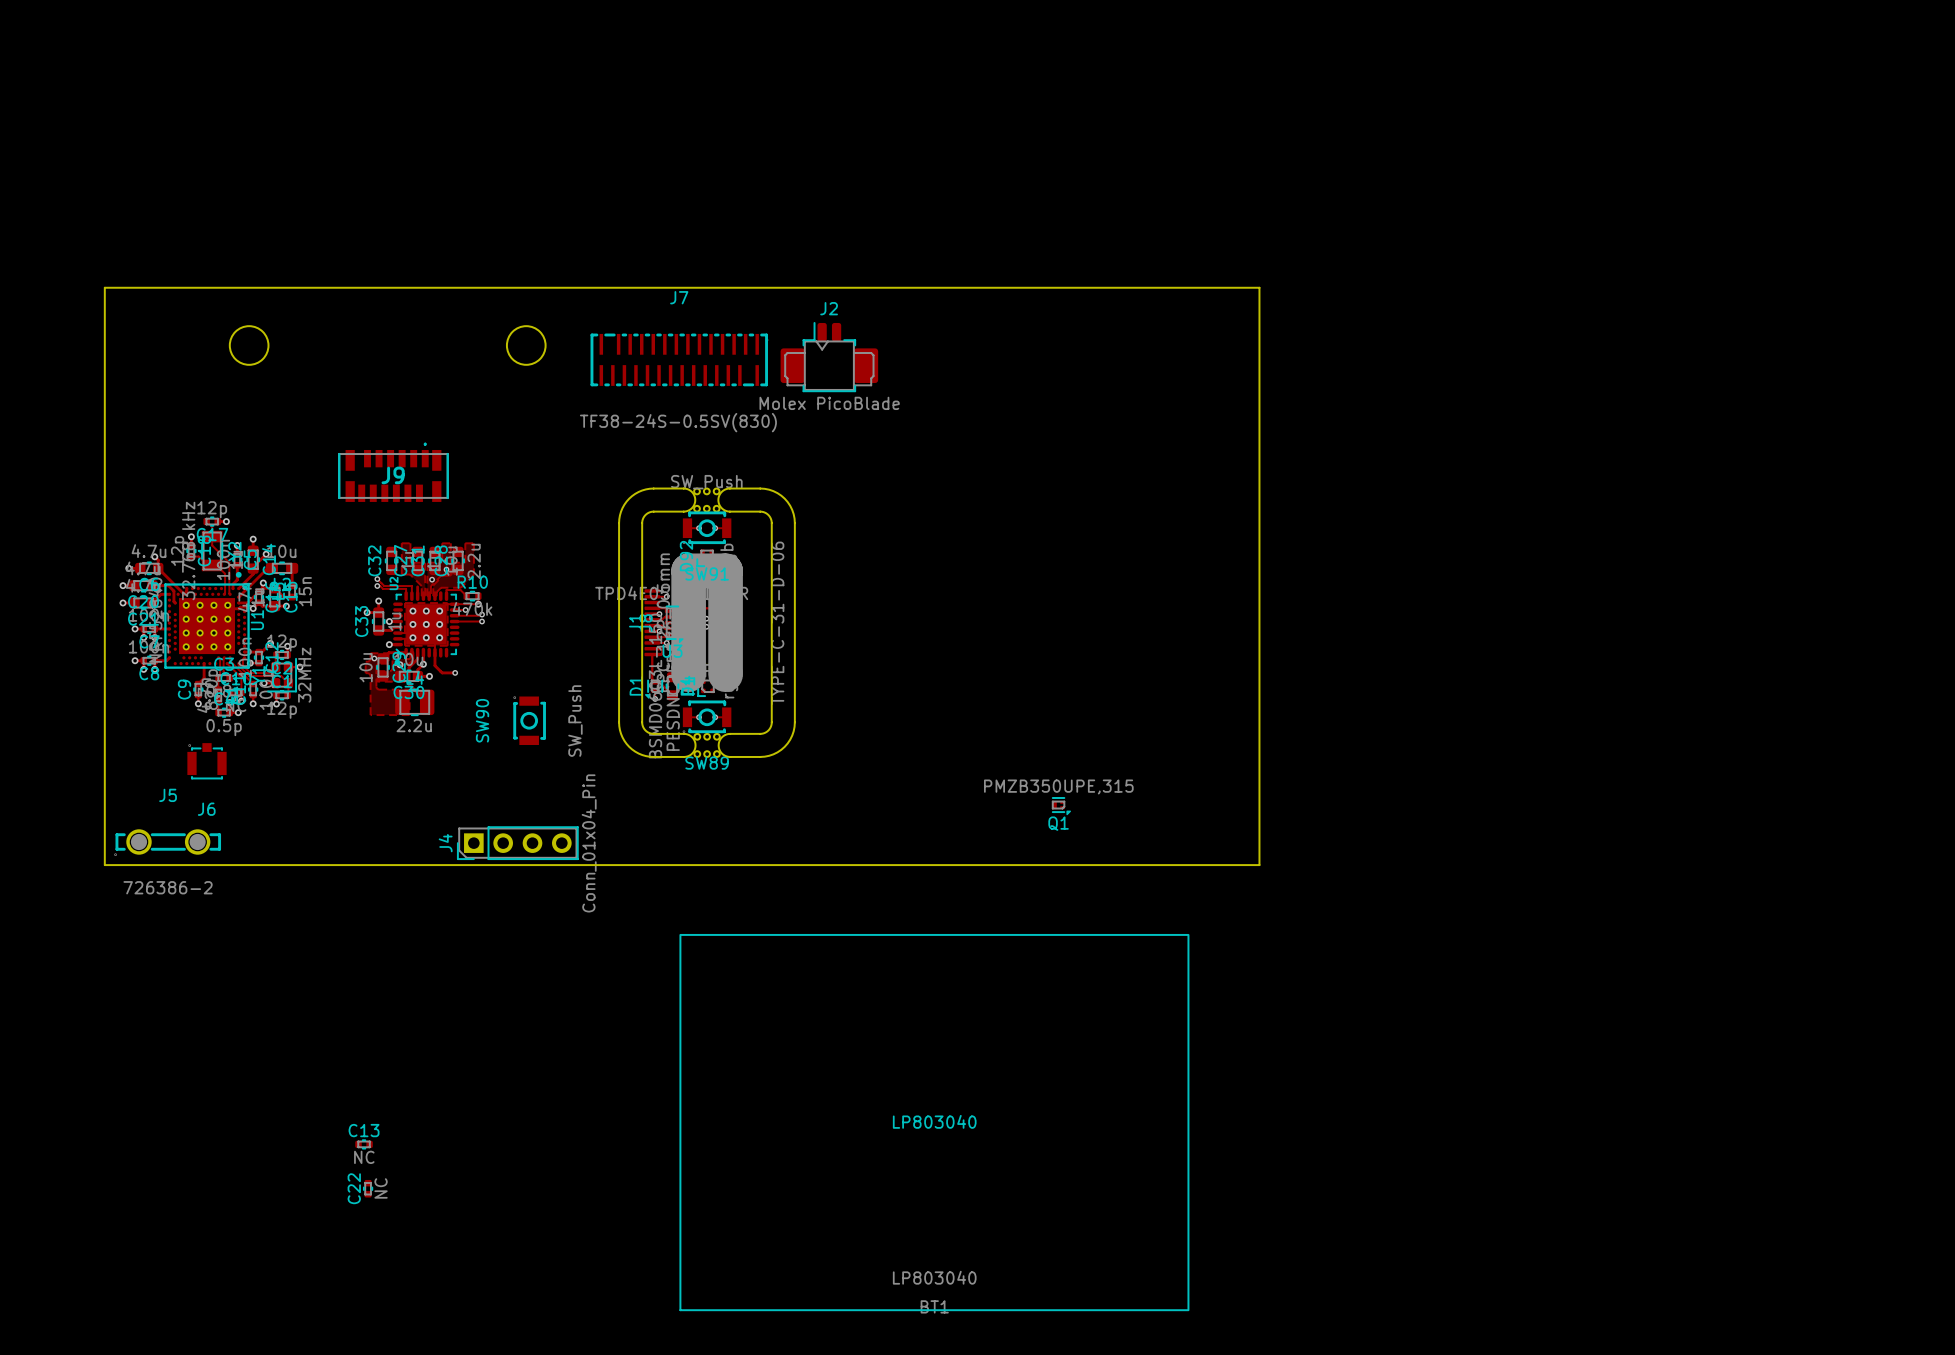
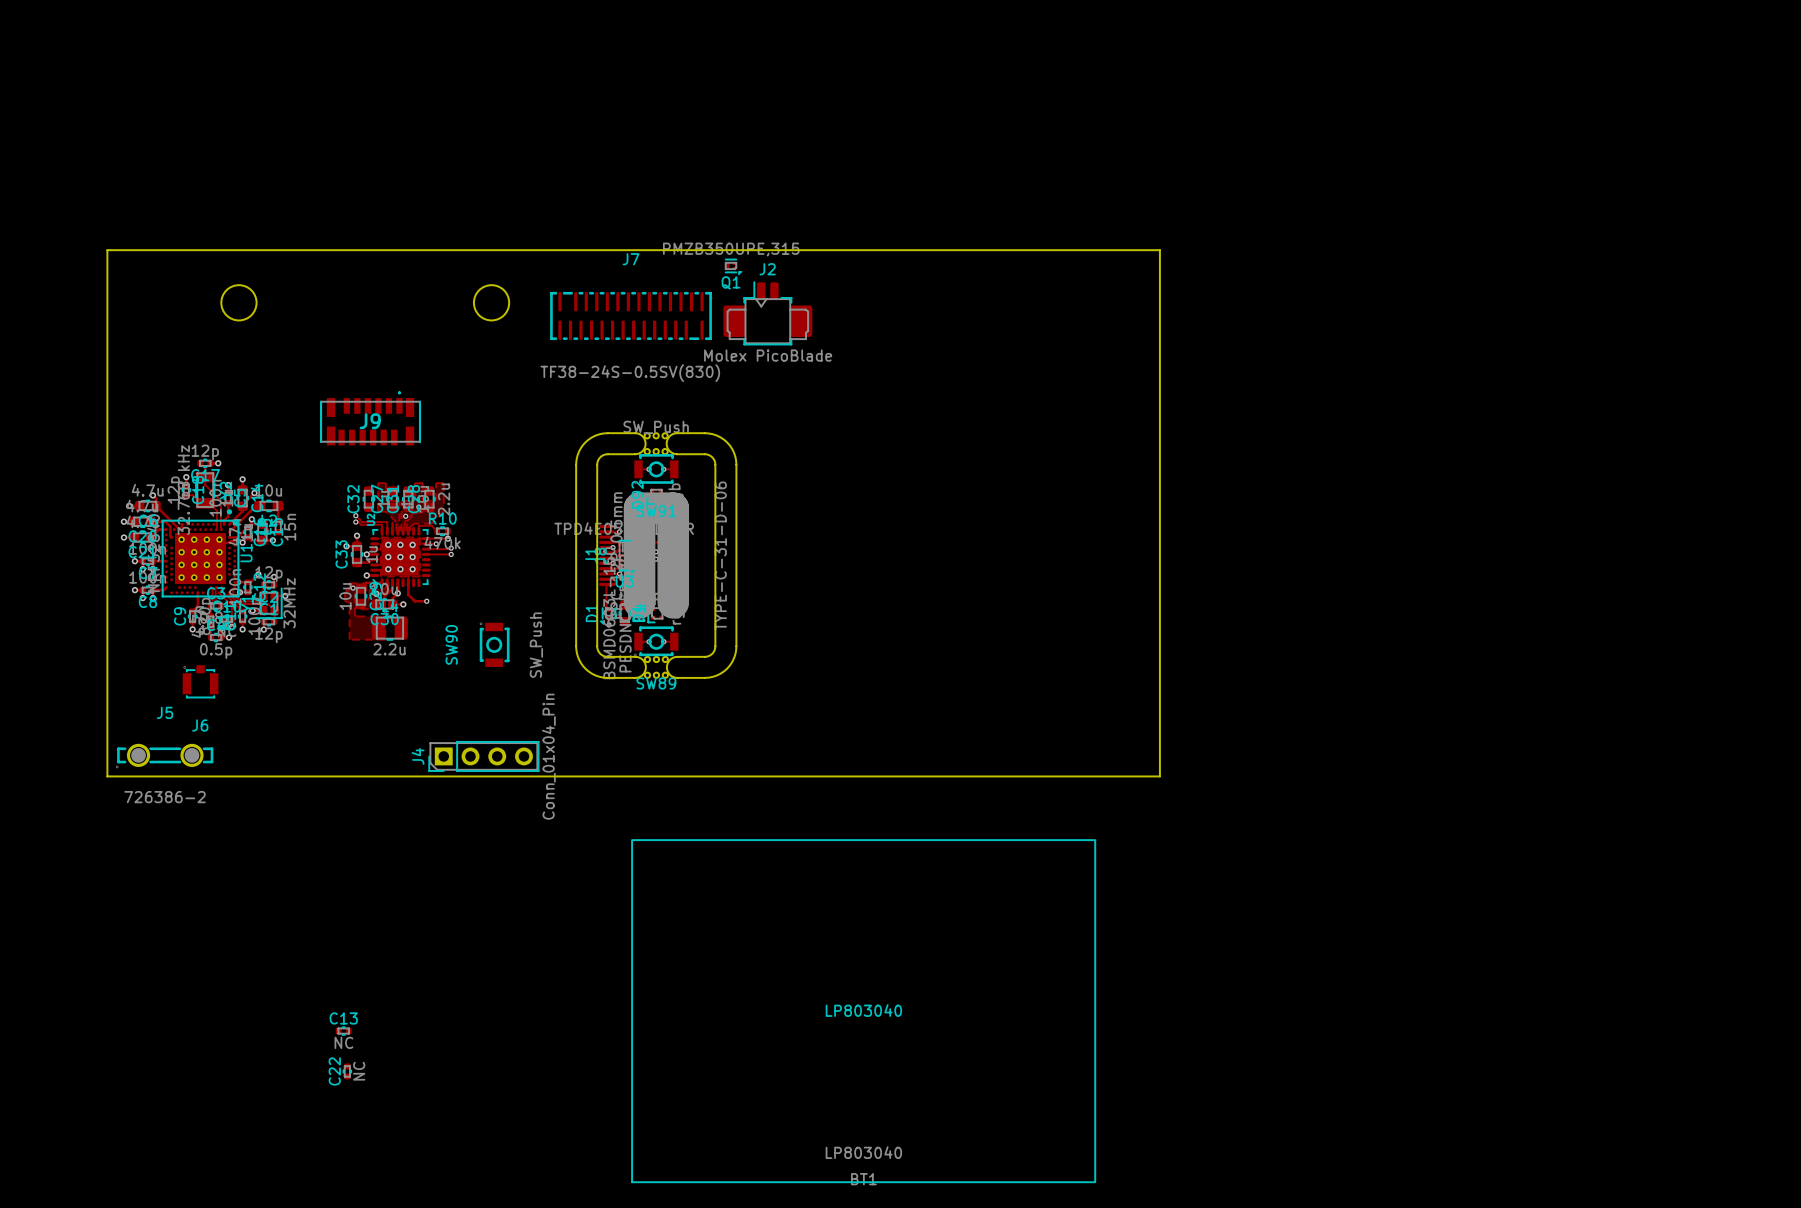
Q1 position: (1061, 806) -> (733, 267)

